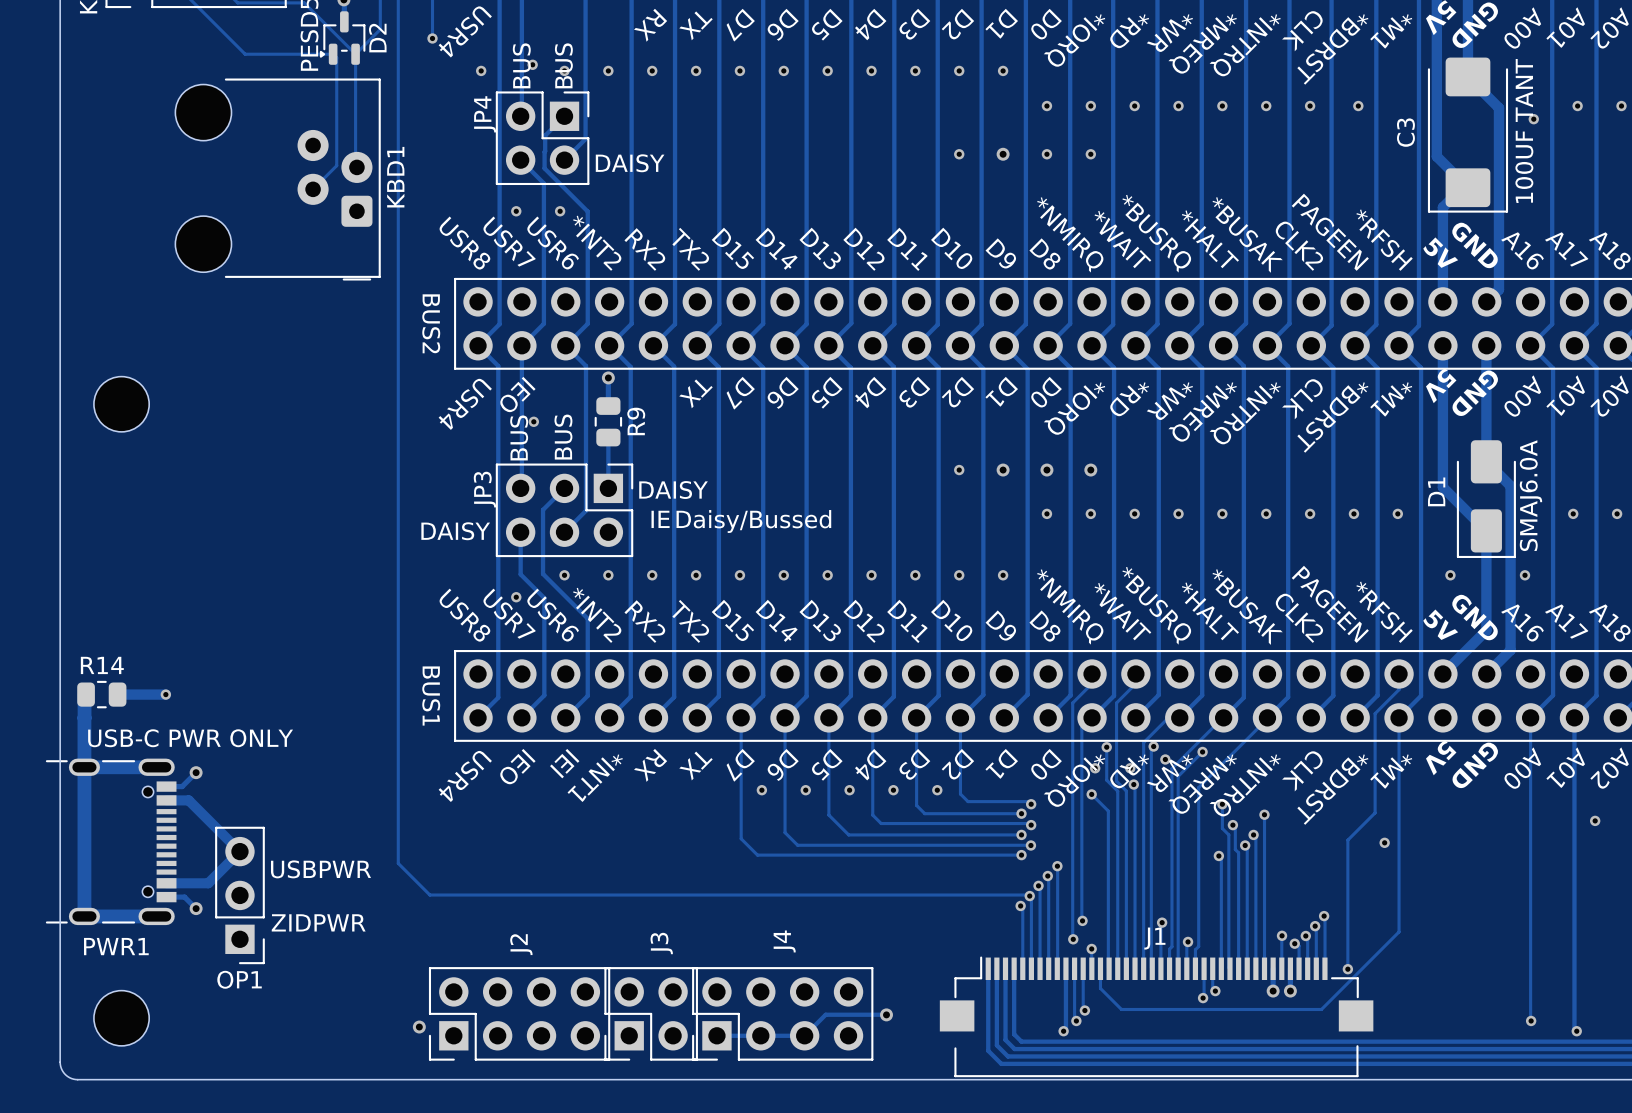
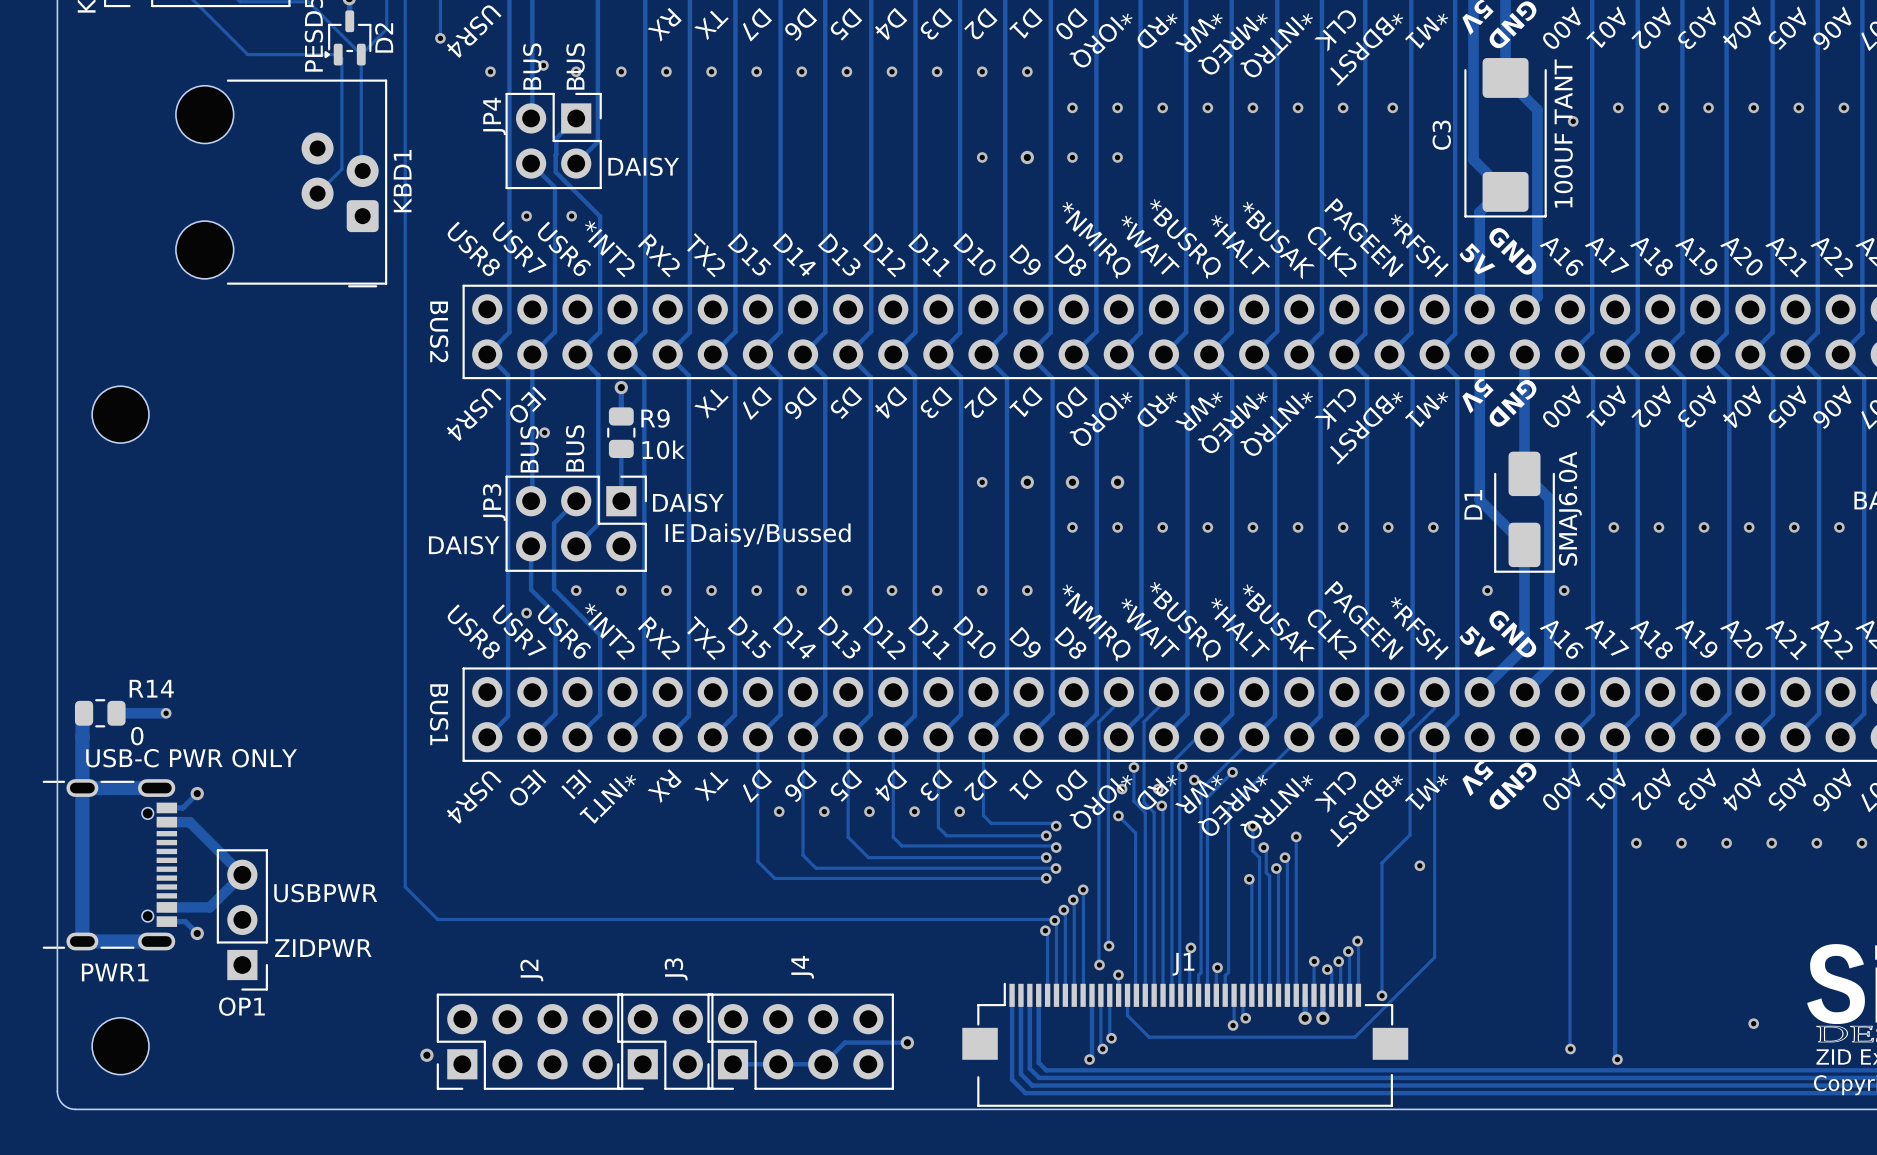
R9 name rotation: 0° (636, 421) -> 90° clockwise (655, 418)
R9 value: none -> 10k (663, 449)
R14 name position: R14 (102, 665) -> R14 (151, 688)
R14 value: none -> 0 (137, 736)

